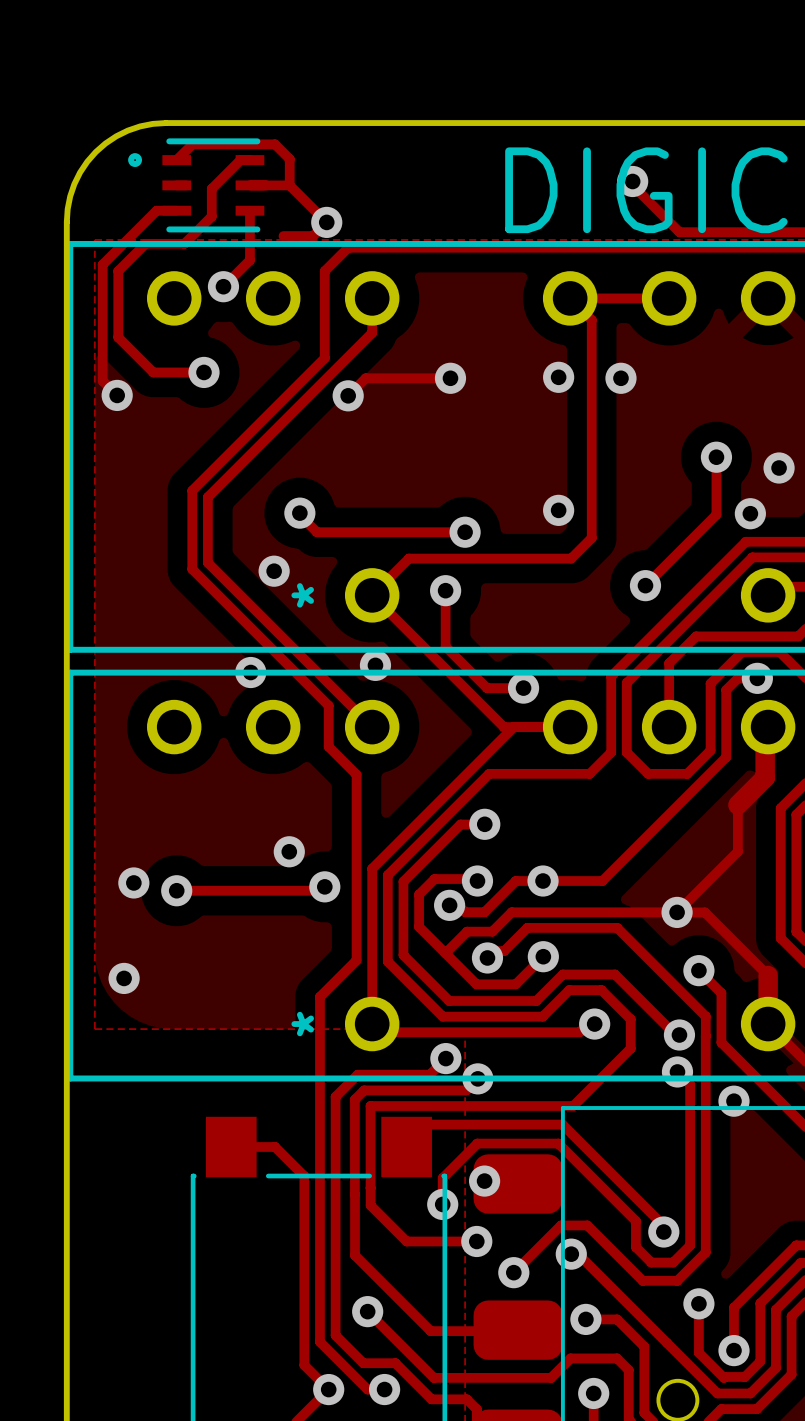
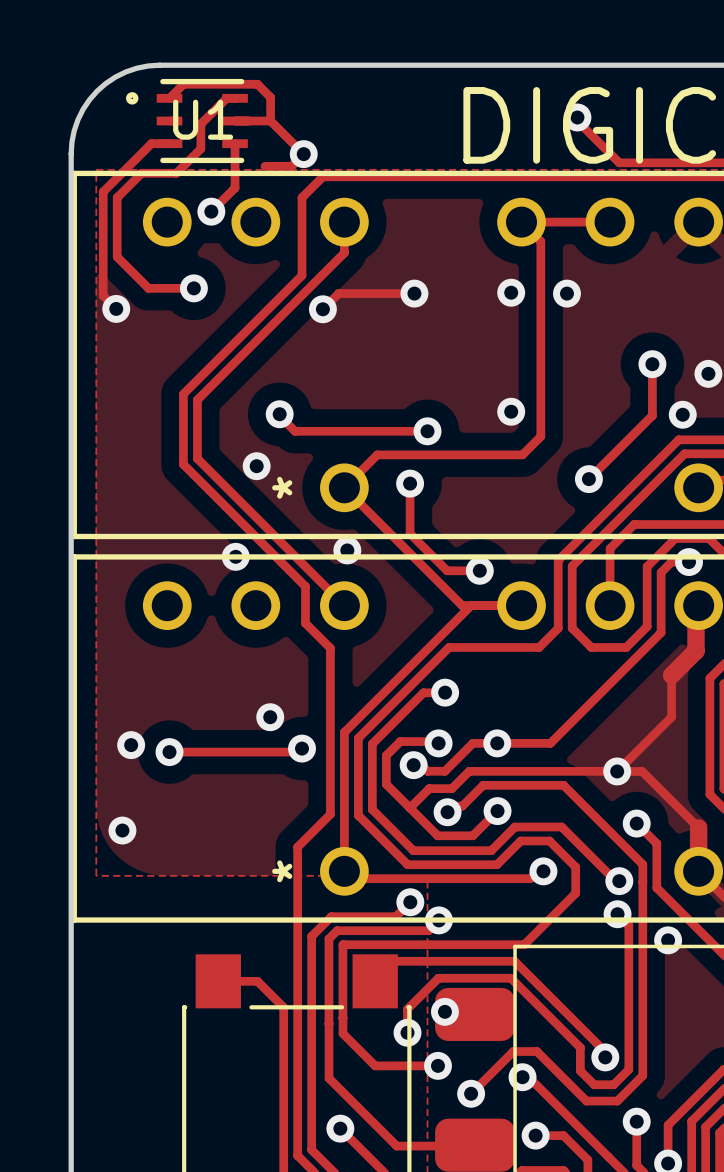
U1 name: none -> U1 (203, 119)

